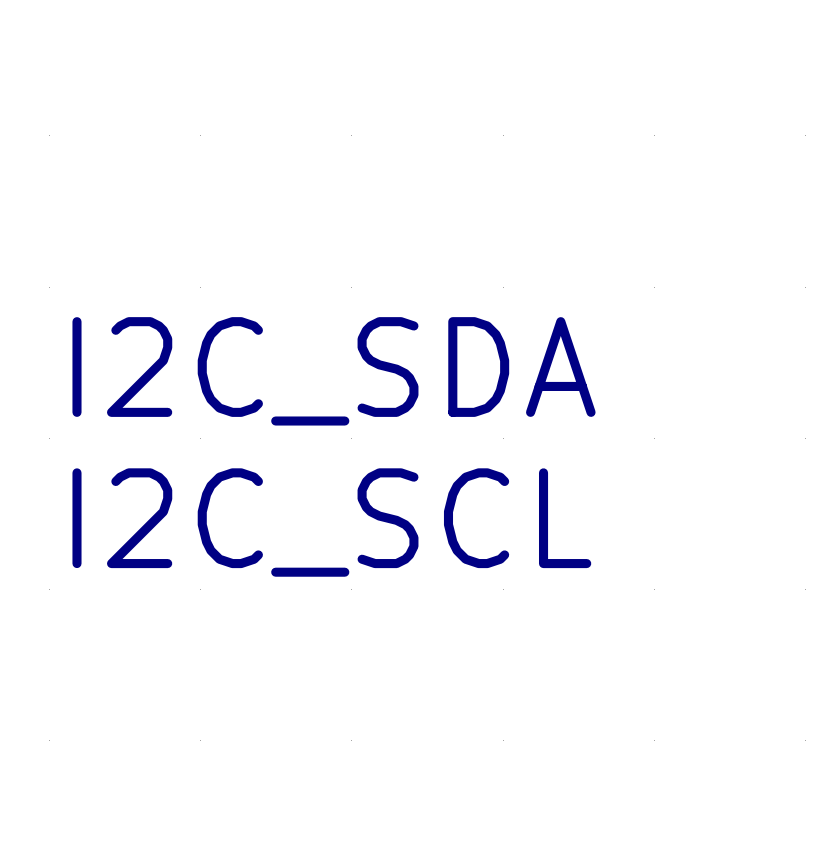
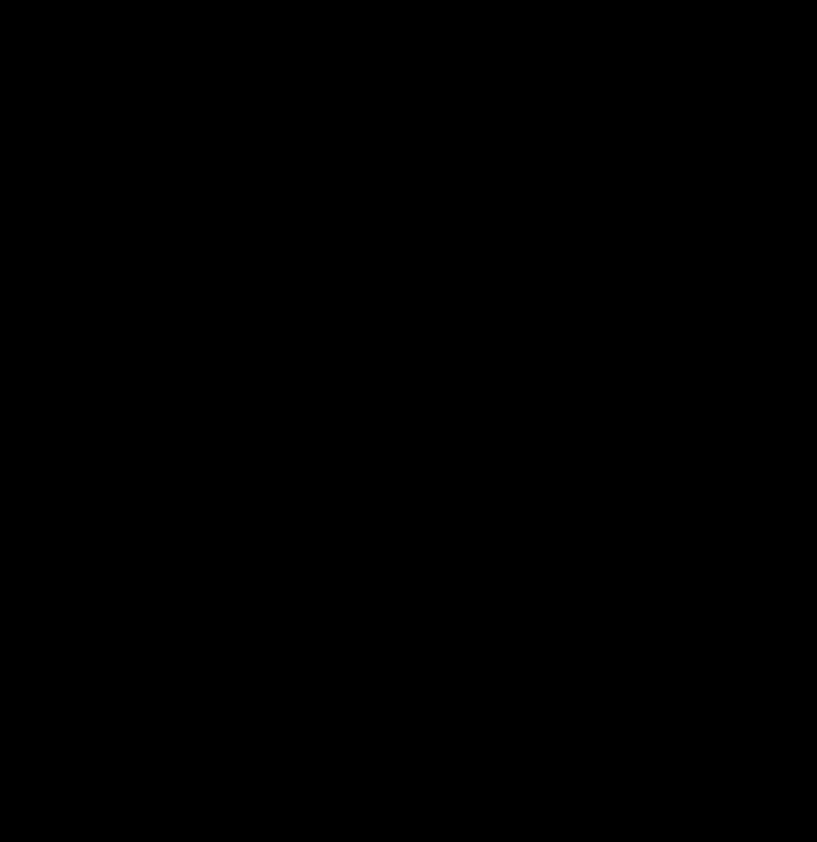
text: I2C_SDA (334, 371) -> none
text: I2C_SCL (331, 522) -> none

